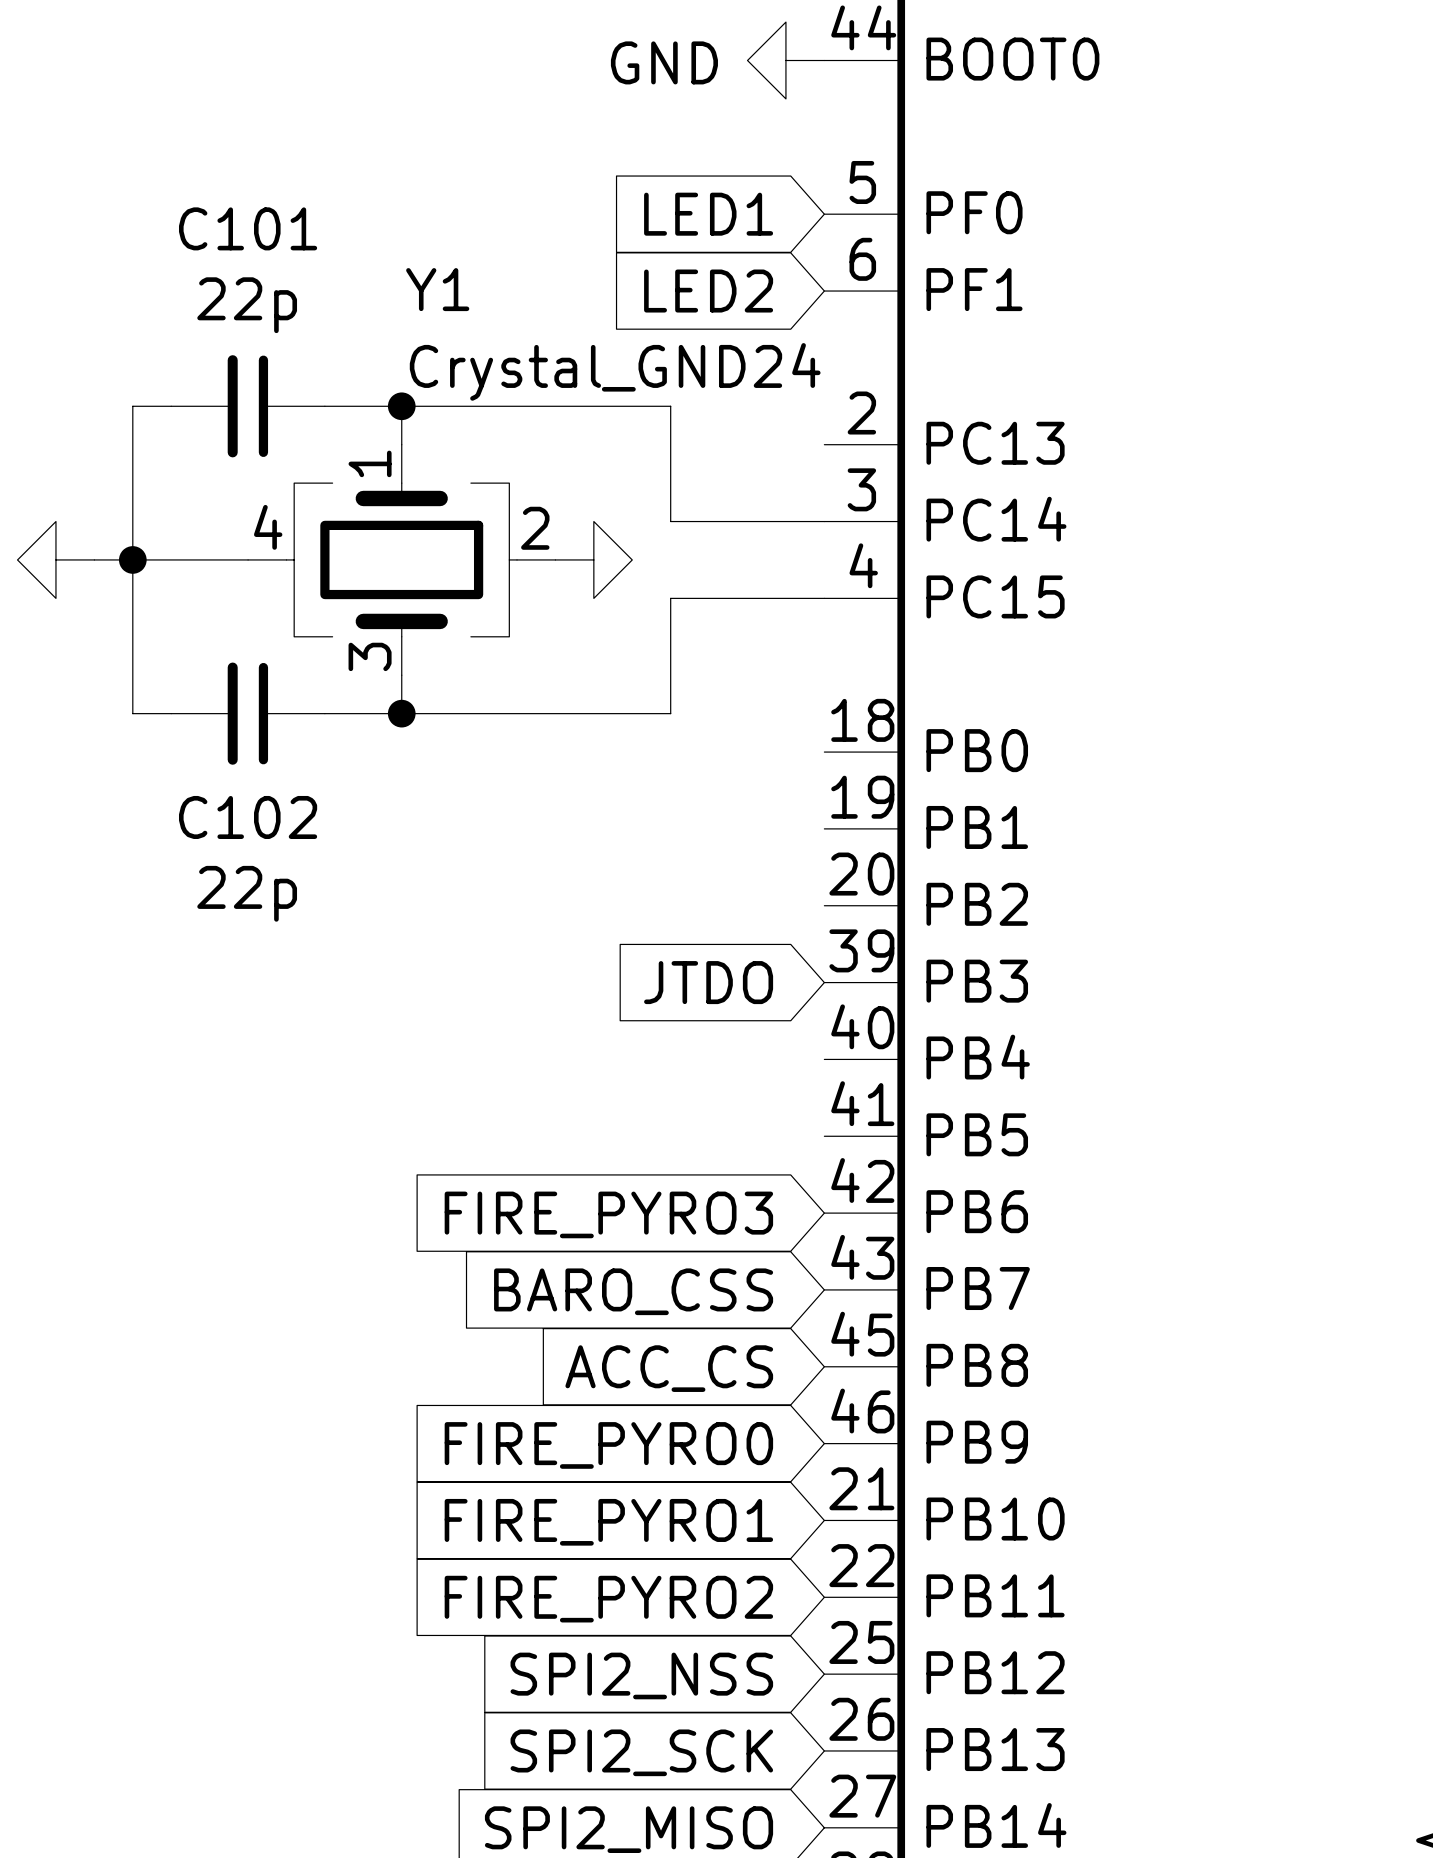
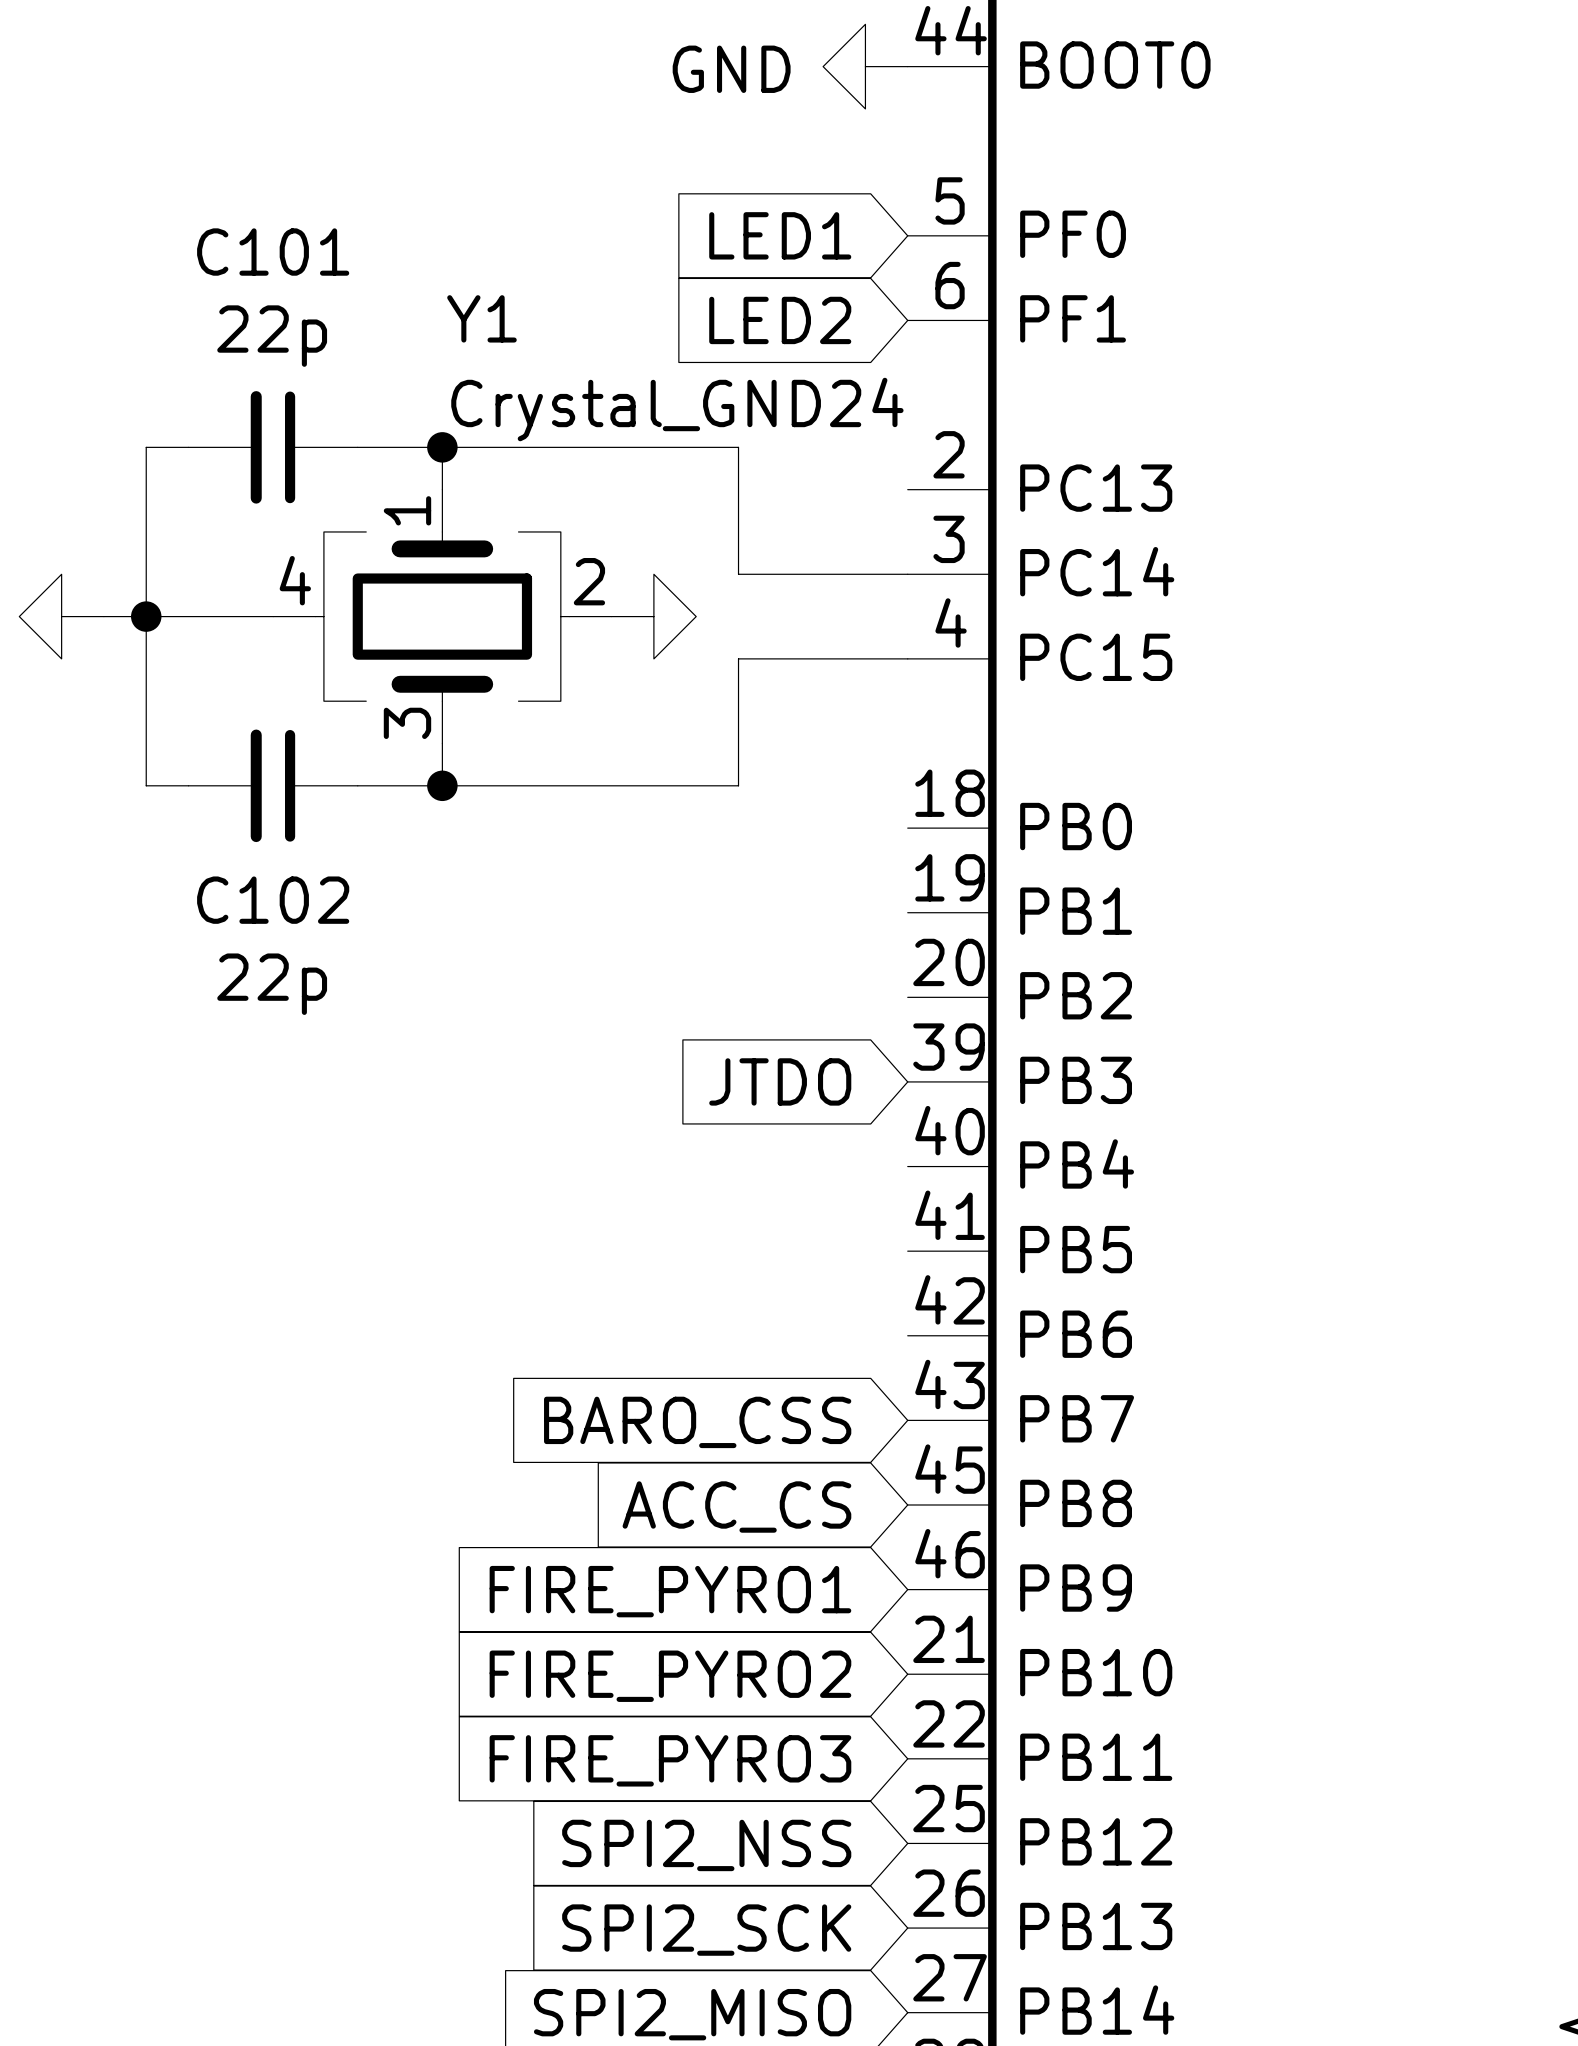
global label: FIRE_PYRO3 (608, 1214) -> none
global label: FIRE_PYRO0 (608, 1445) -> FIRE_PYRO1 (670, 1591)
global label: FIRE_PYRO1 (608, 1522) -> FIRE_PYRO2 (670, 1676)
global label: FIRE_PYRO2 (608, 1599) -> FIRE_PYRO3 (670, 1760)

